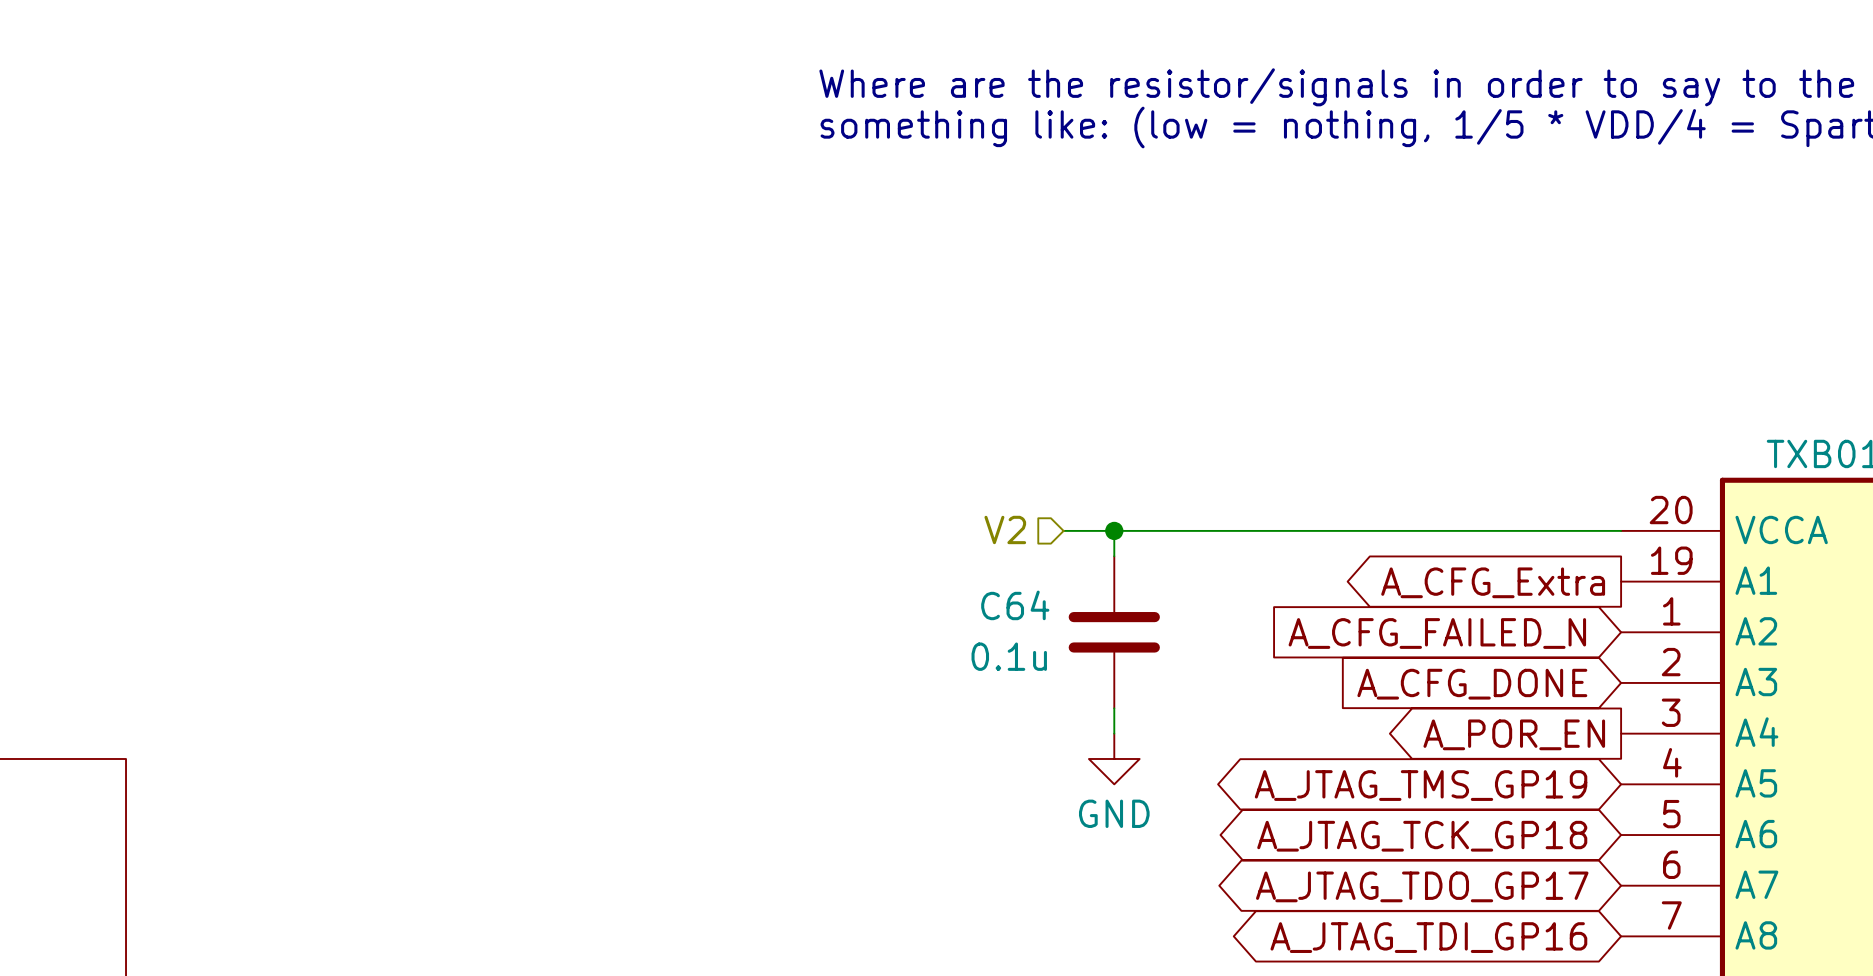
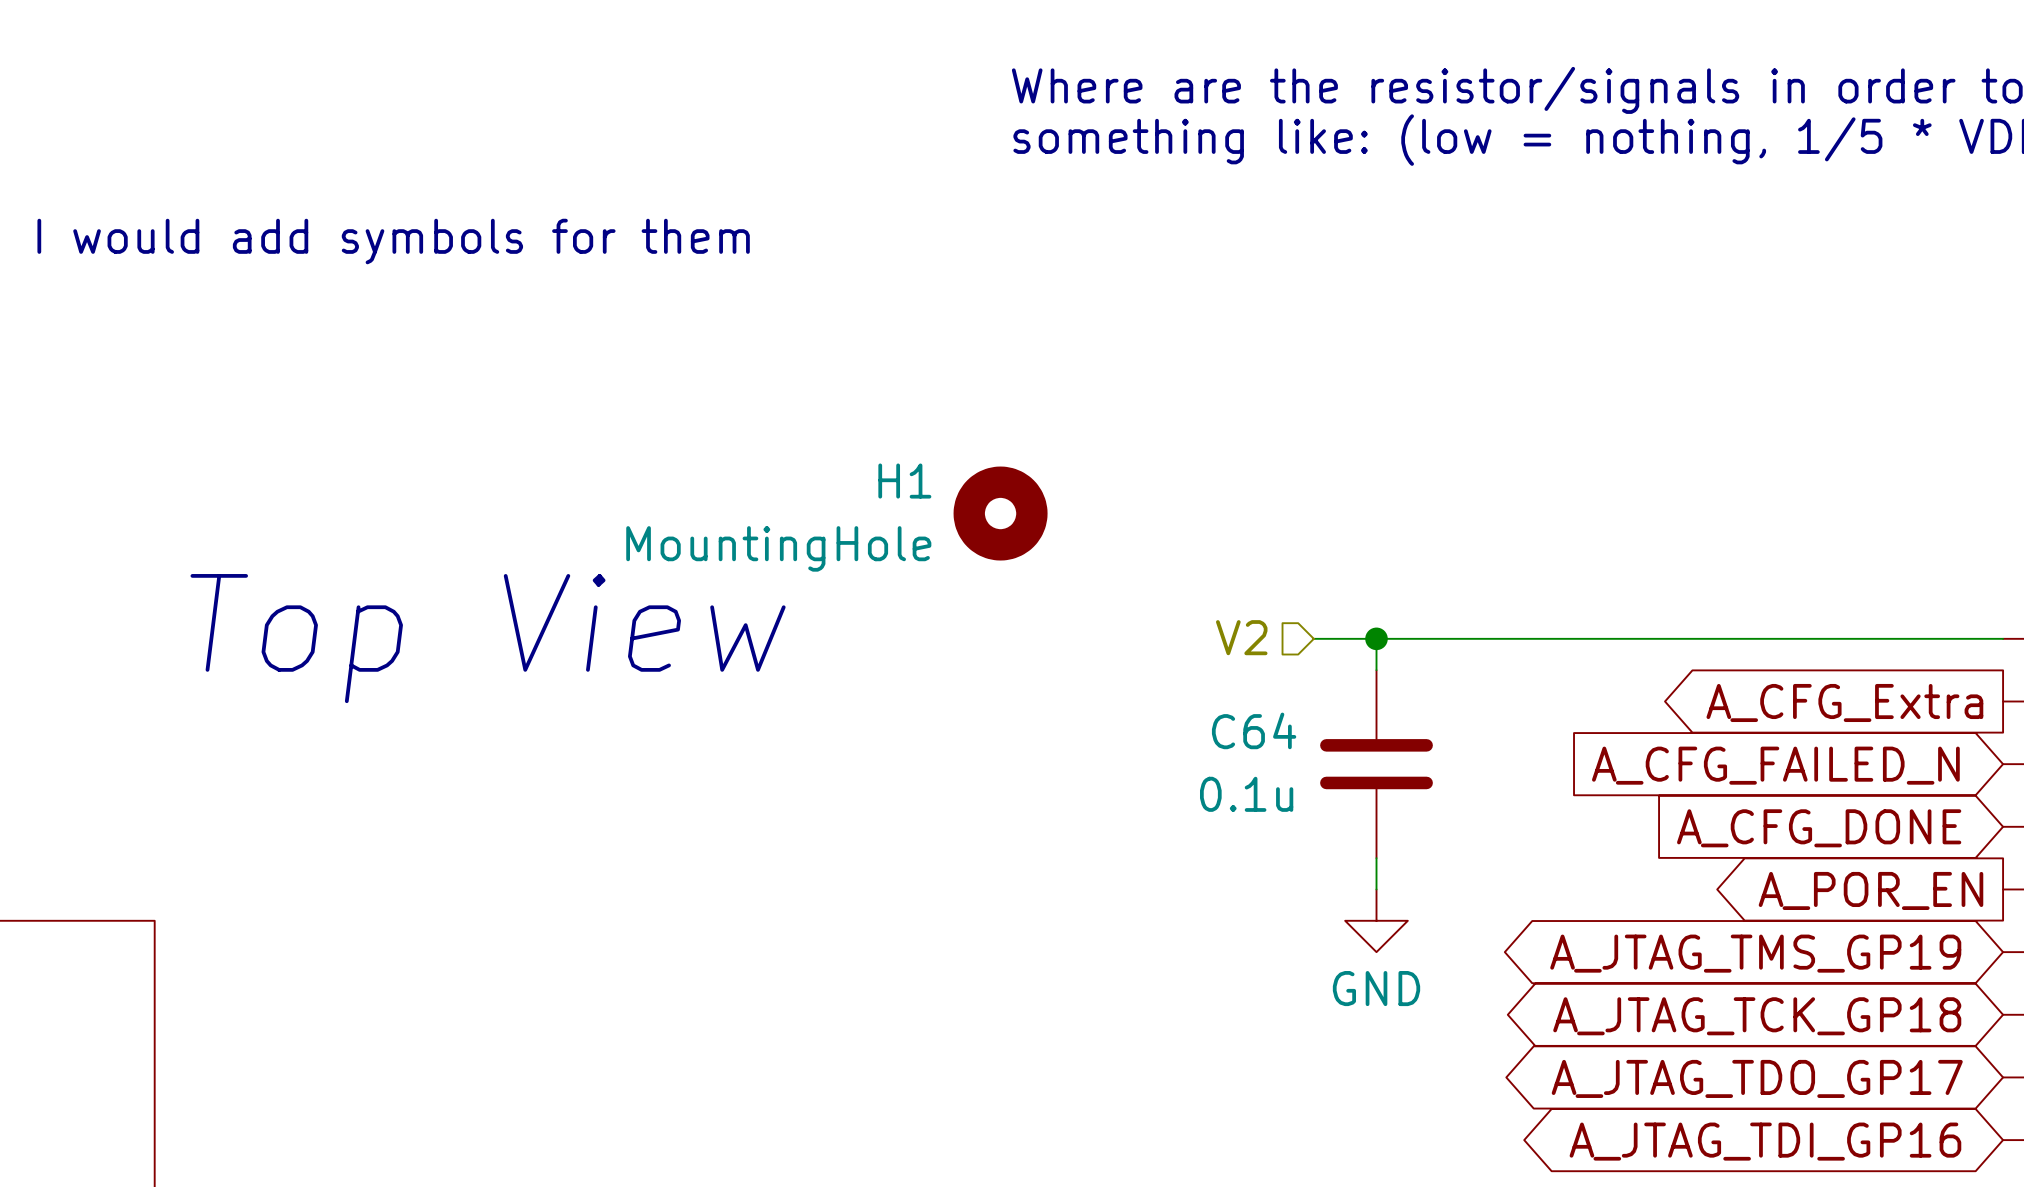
text: none -> I would add symbols for them (393, 241)
H1: none -> MountingHole (1000, 513)
text: none -> Top View (488, 638)

